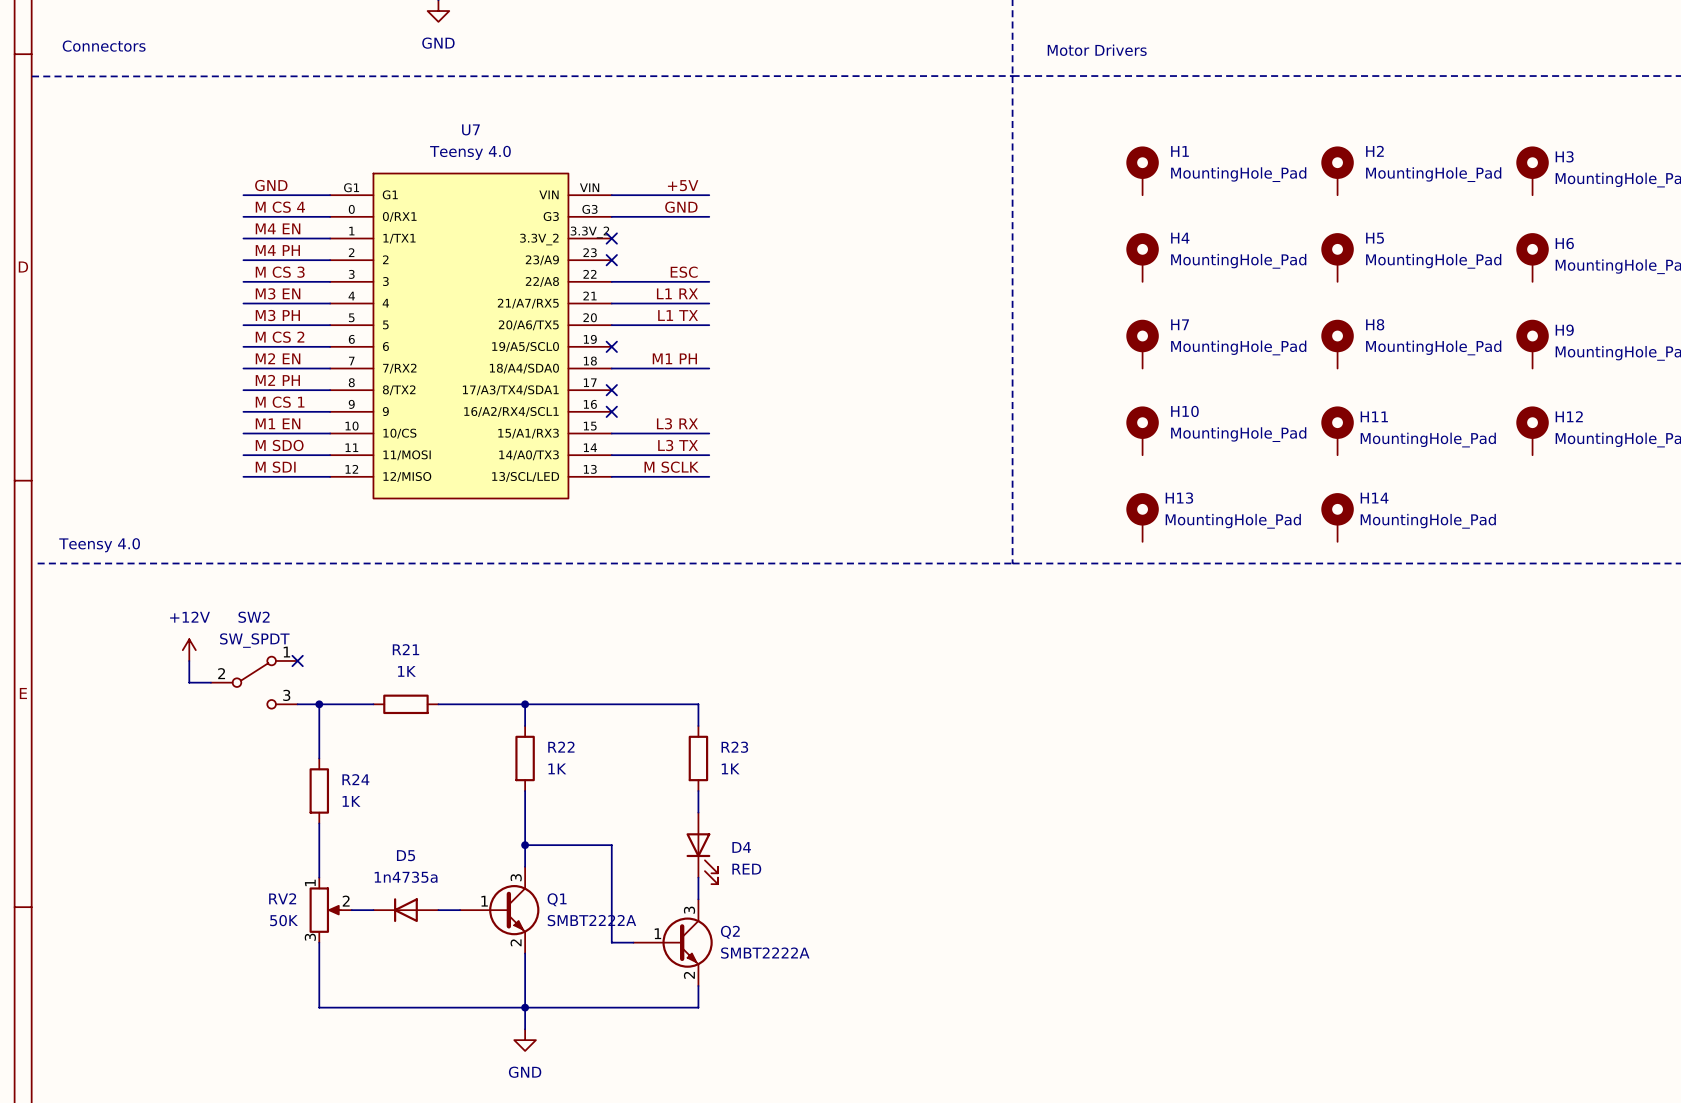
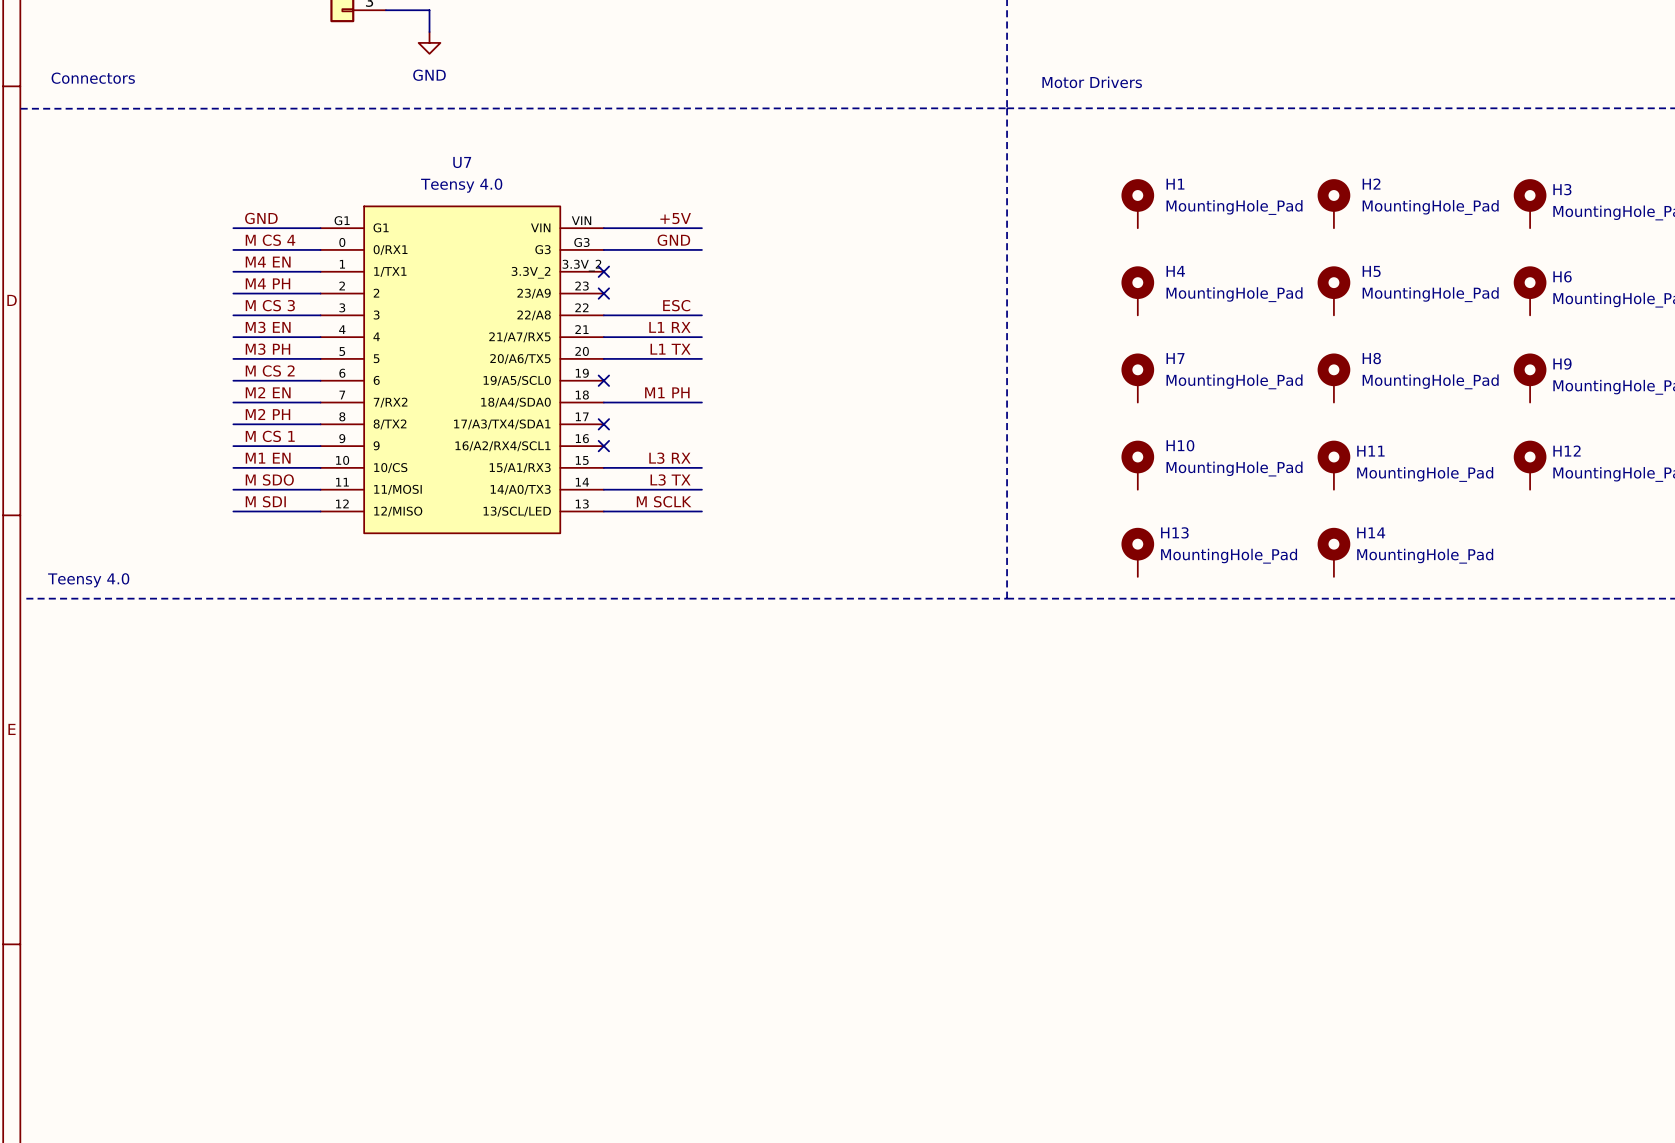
power symbol: +12V (189, 650) -> none
wire: (189, 660) (189, 682) (210, 682) -> none
no-connect mark: (297, 660) -> none
SW2: SW_SPDT (254, 682) -> none
wire: (297, 704) (373, 704) -> none
wire: (319, 704) (319, 758) -> none
junction: (319, 704) -> none
R21: 1K (405, 704) -> none
wire: (438, 704) (698, 704) (698, 725) -> none
wire: (525, 704) (525, 725) -> none
junction: (525, 704) -> none
R22: 1K (525, 758) -> none
R23: 1K (698, 758) -> none
R24: 1K (319, 790) -> none
wire: (525, 790) (525, 866) -> none
wire: (698, 790) (698, 812) -> none
wire: (319, 823) (319, 877) -> none
wire: (525, 845) (611, 845) (611, 942) (633, 942) -> none
junction: (525, 845) -> none
D4: RED (702, 848) -> none
wire: (698, 877) (698, 899) -> none
RV2: 50K (330, 910) -> none
wire: (351, 910) (373, 910) -> none
D5: 1n4735a (405, 910) -> none
wire: (438, 910) (460, 910) -> none
Q1: SMBT2222A (499, 910) -> none
wire: (319, 942) (319, 1007) (698, 1007) (698, 985) -> none
Q2: SMBT2222A (673, 942) -> none
wire: (525, 953) (525, 1029) -> none
junction: (525, 1007) -> none
power symbol: GND (525, 1040) -> none

